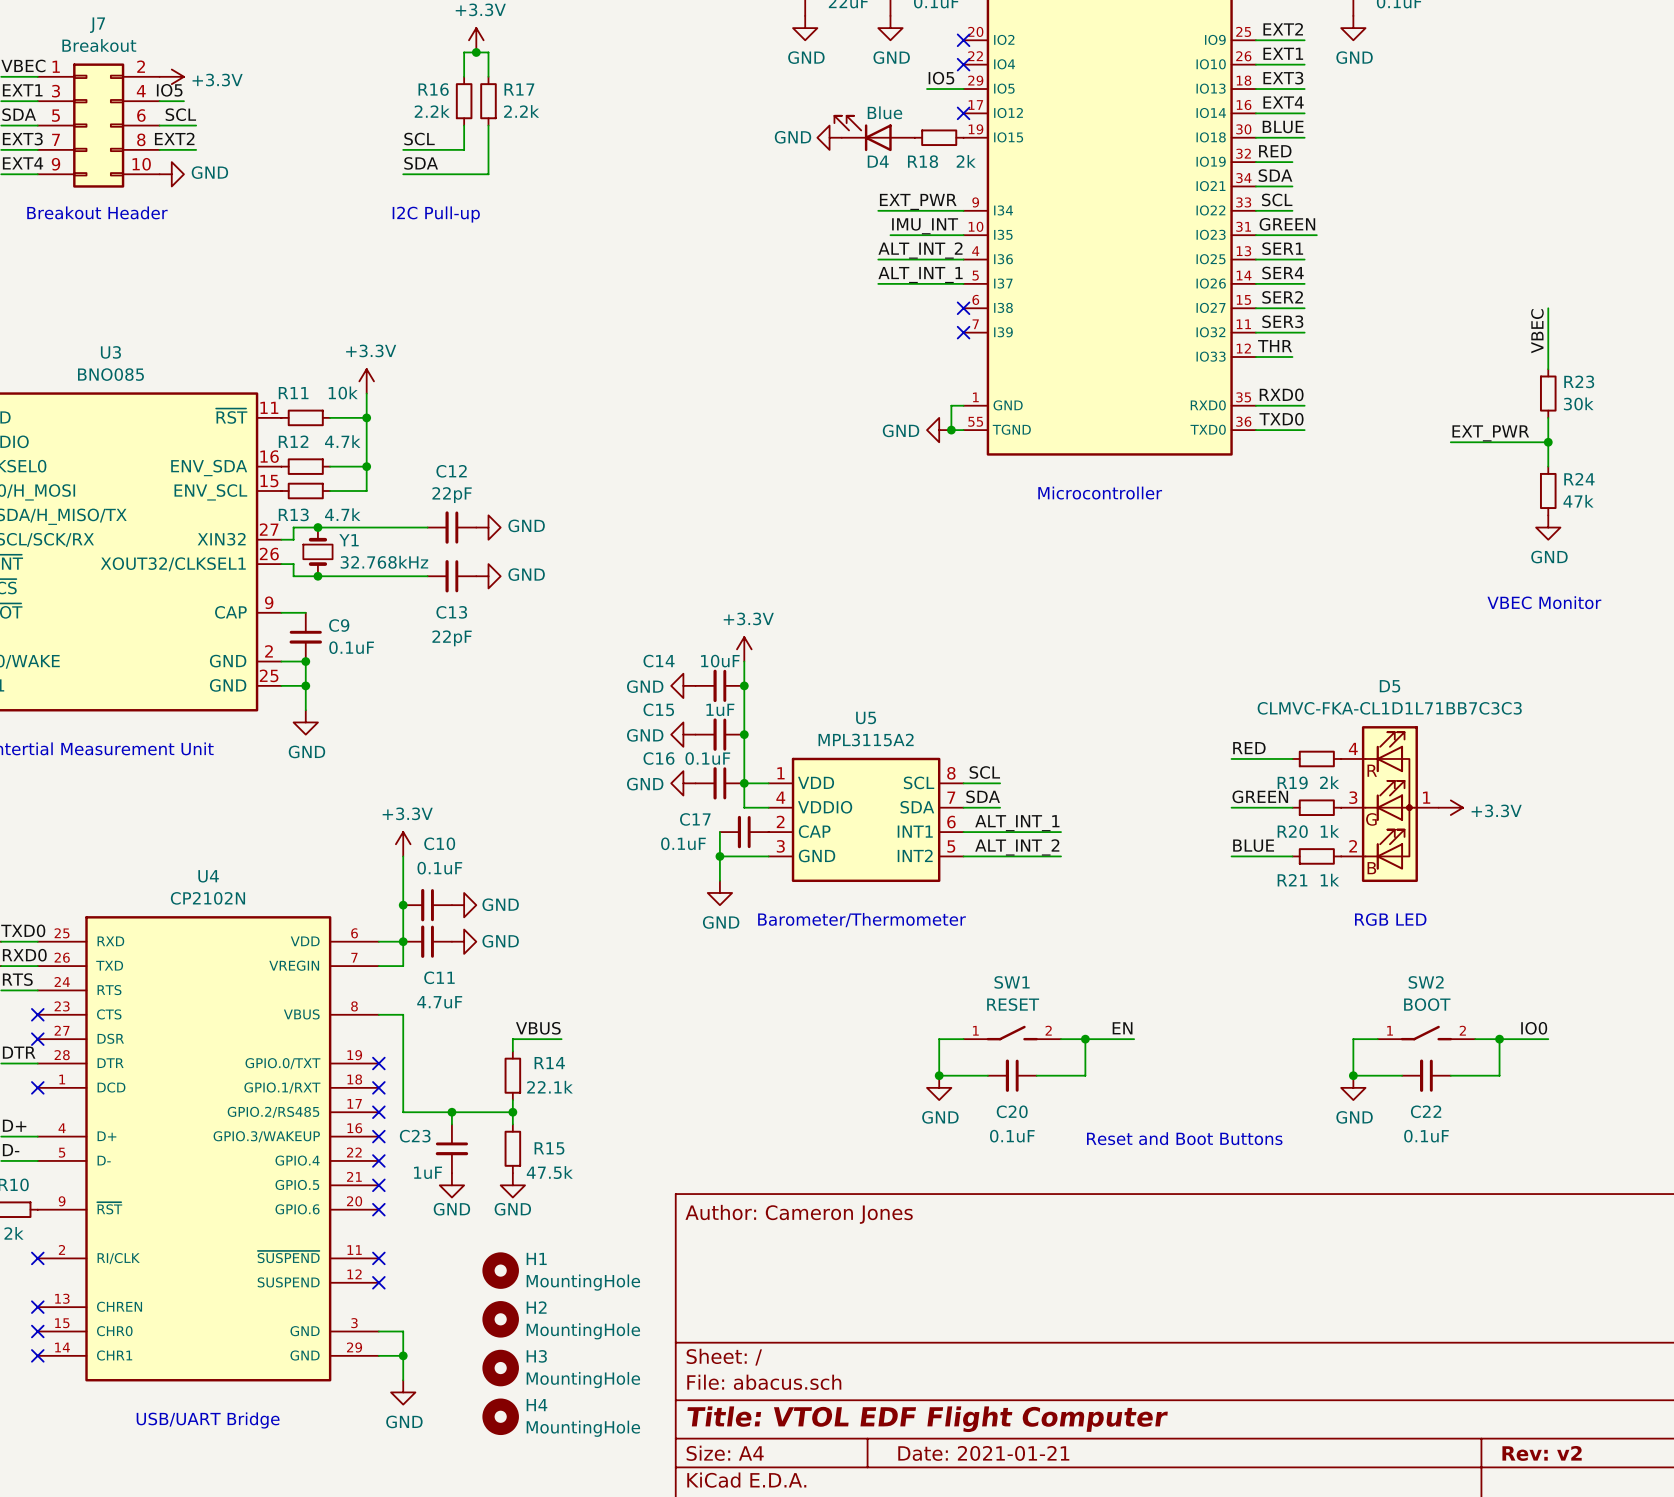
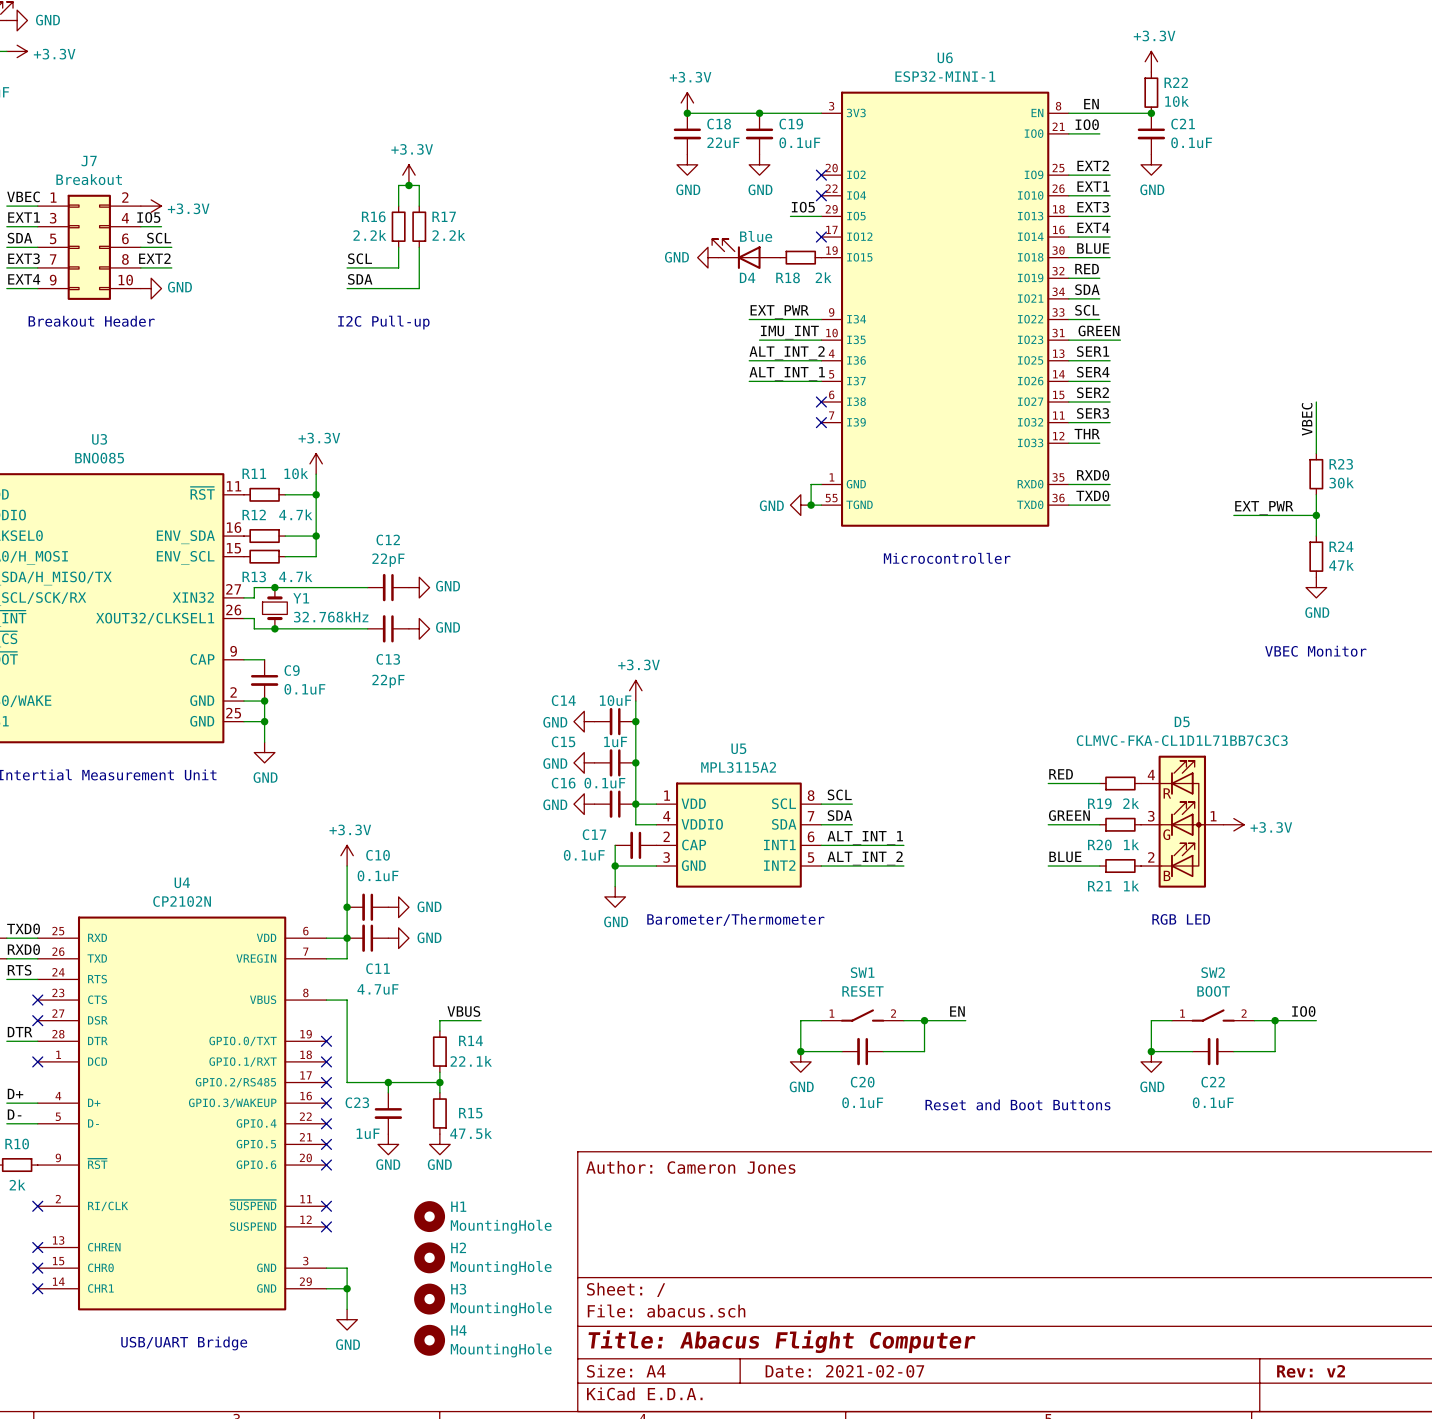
title block: Title: VTOL EDF Flight Computer (927, 1419) -> Title: Abacus Flight Computer (781, 1341)
title block: Date: 2021-01-21 (983, 1453) -> Date: 2021-02-07 (844, 1371)

